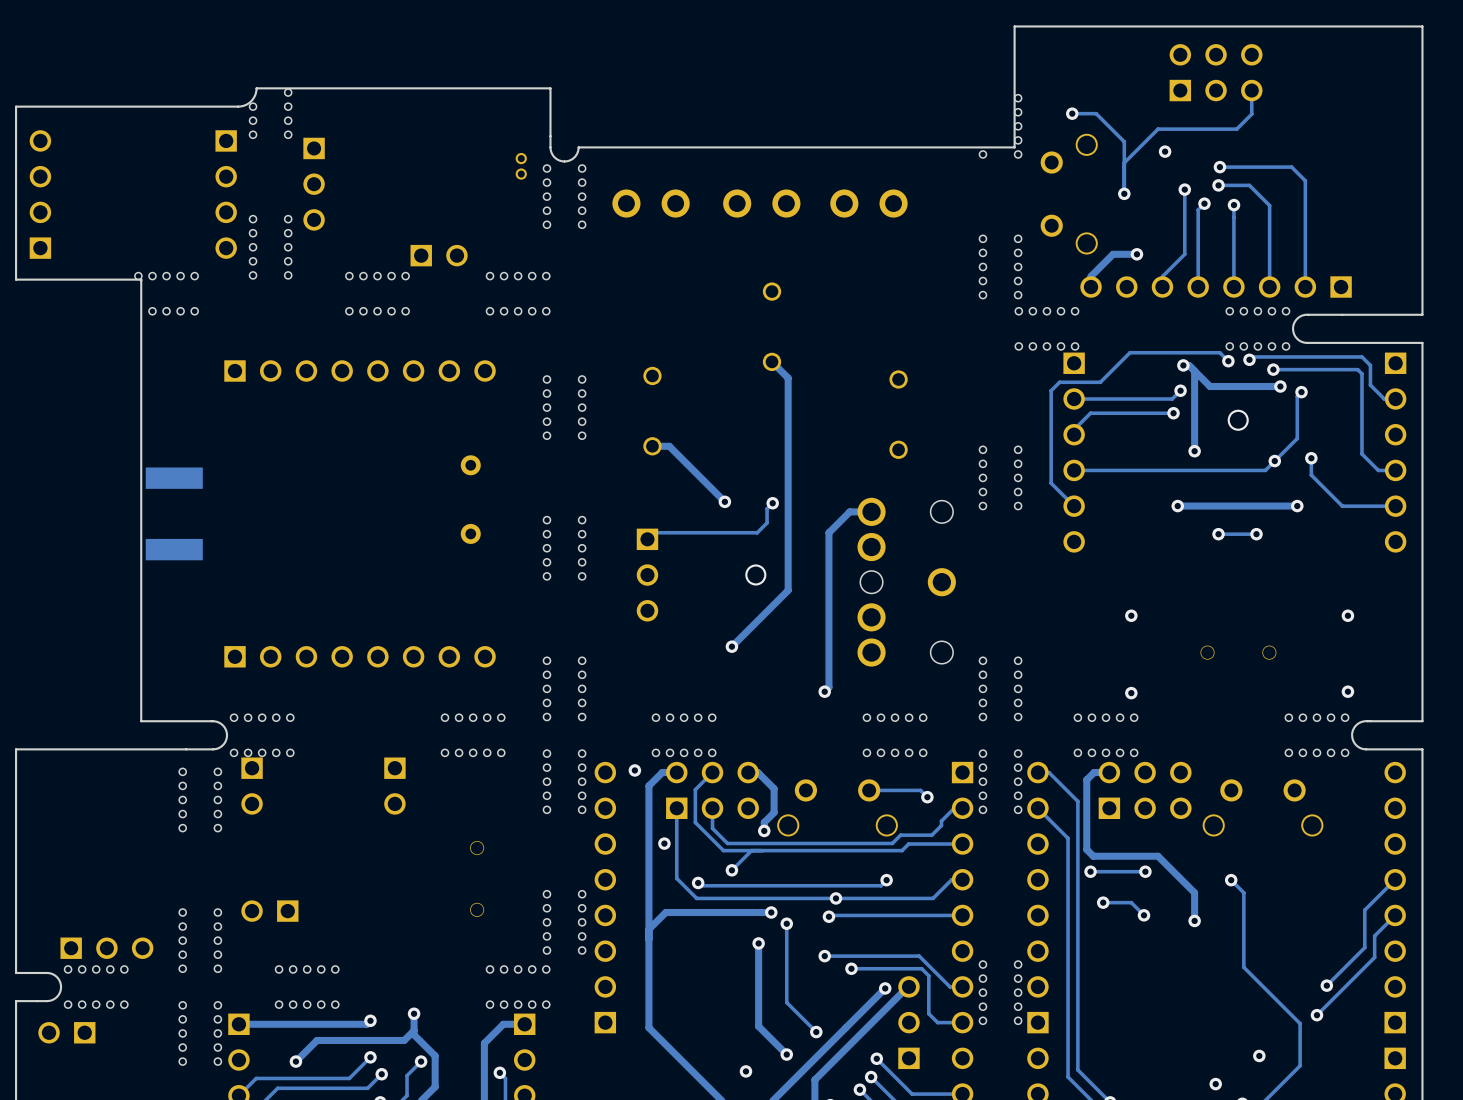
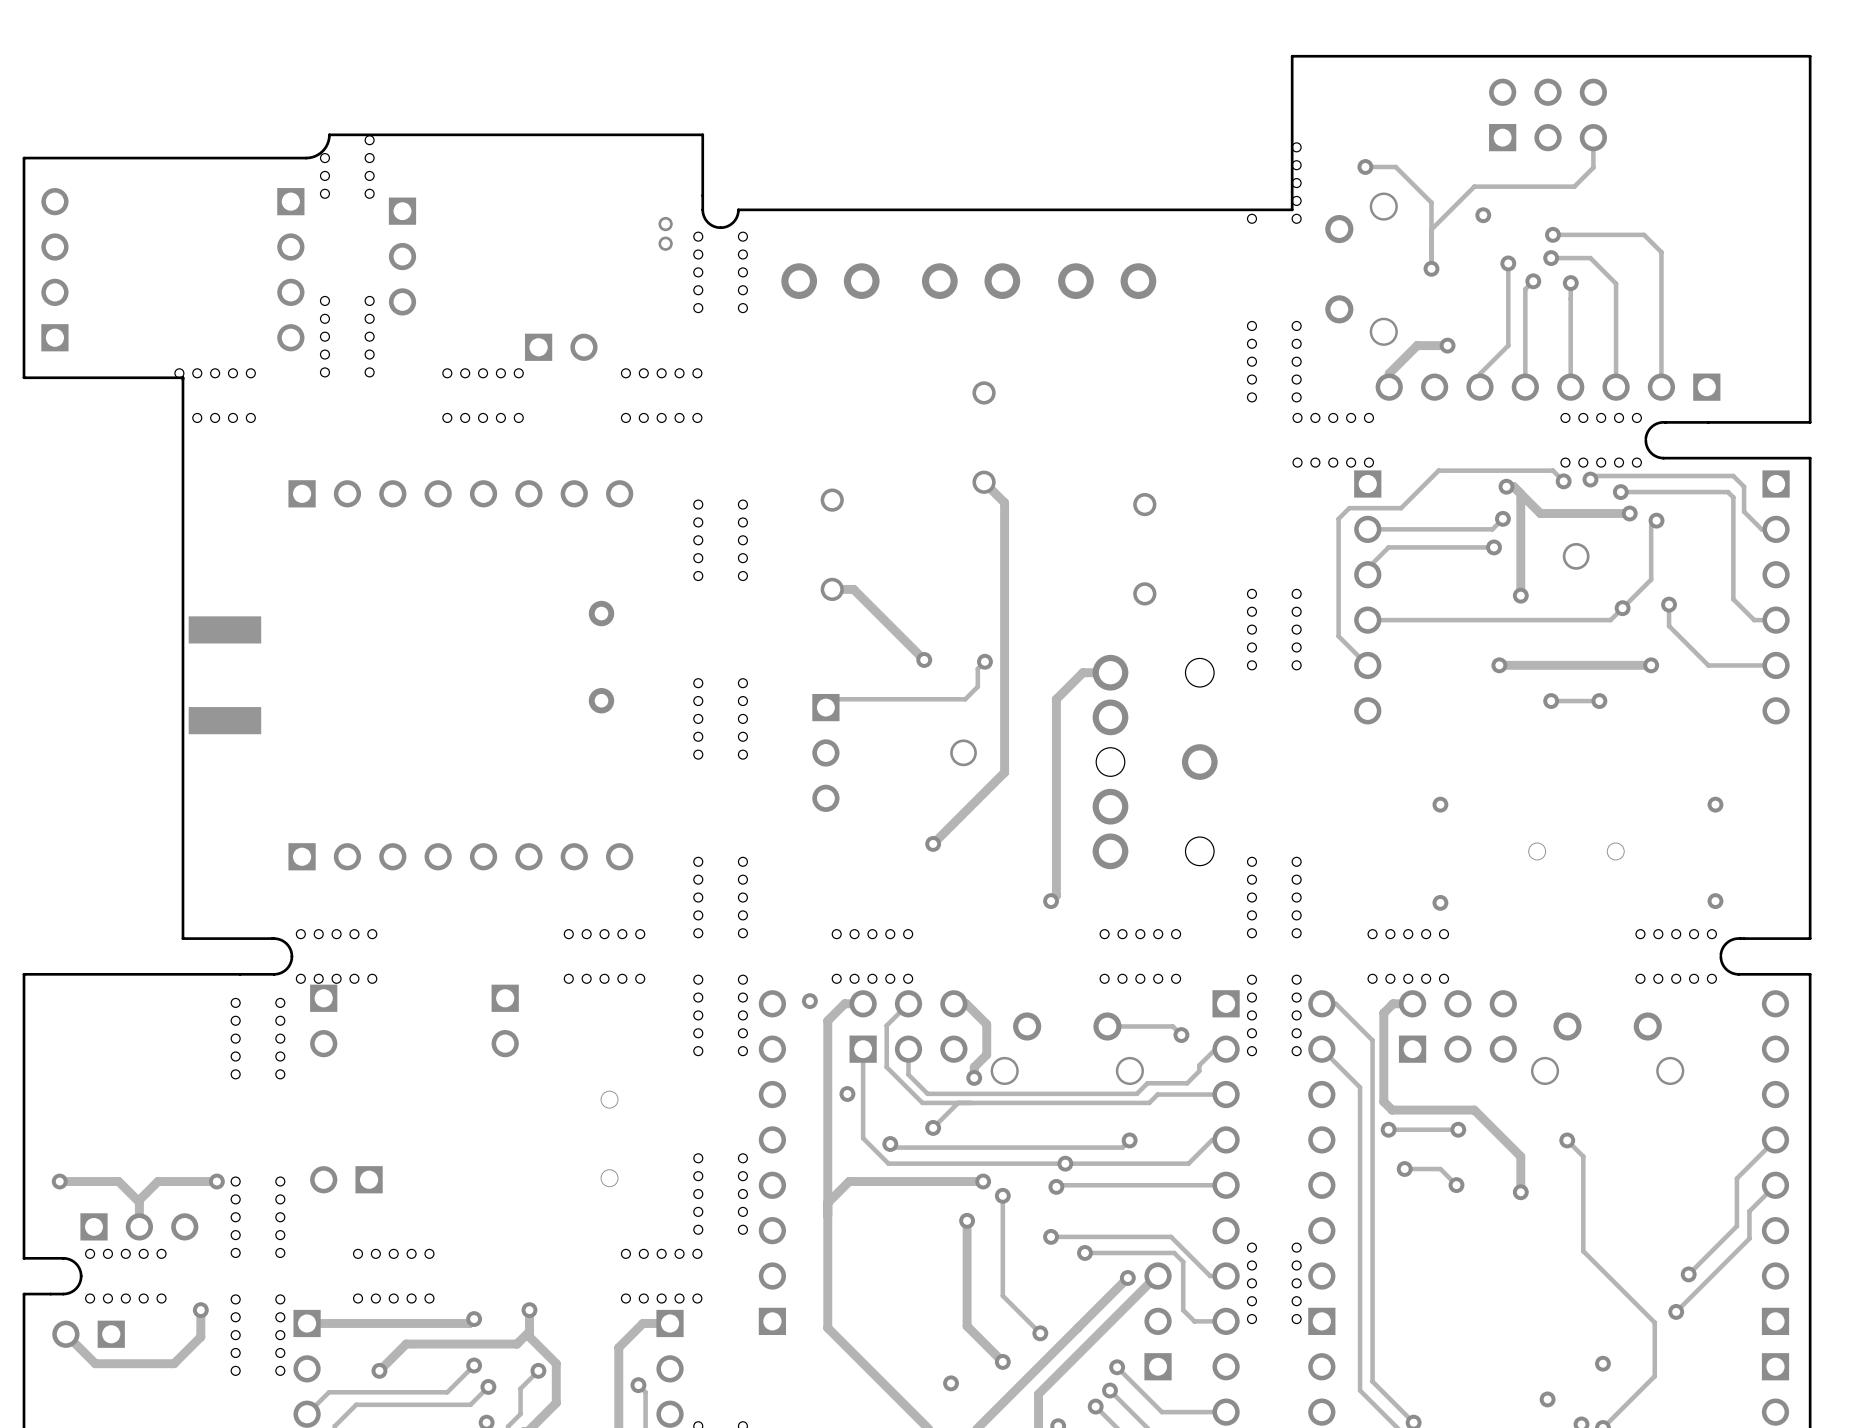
track: none -> (59, 1181) (118, 1181) (139, 1202)
via: none -> (59, 1181)
track: none -> (216, 1181) (157, 1181) (139, 1200) (139, 1226)
via: none -> (216, 1181)
track: none -> (200, 1310) (200, 1336) (174, 1363) (95, 1363) (65, 1334)
via: none -> (200, 1310)

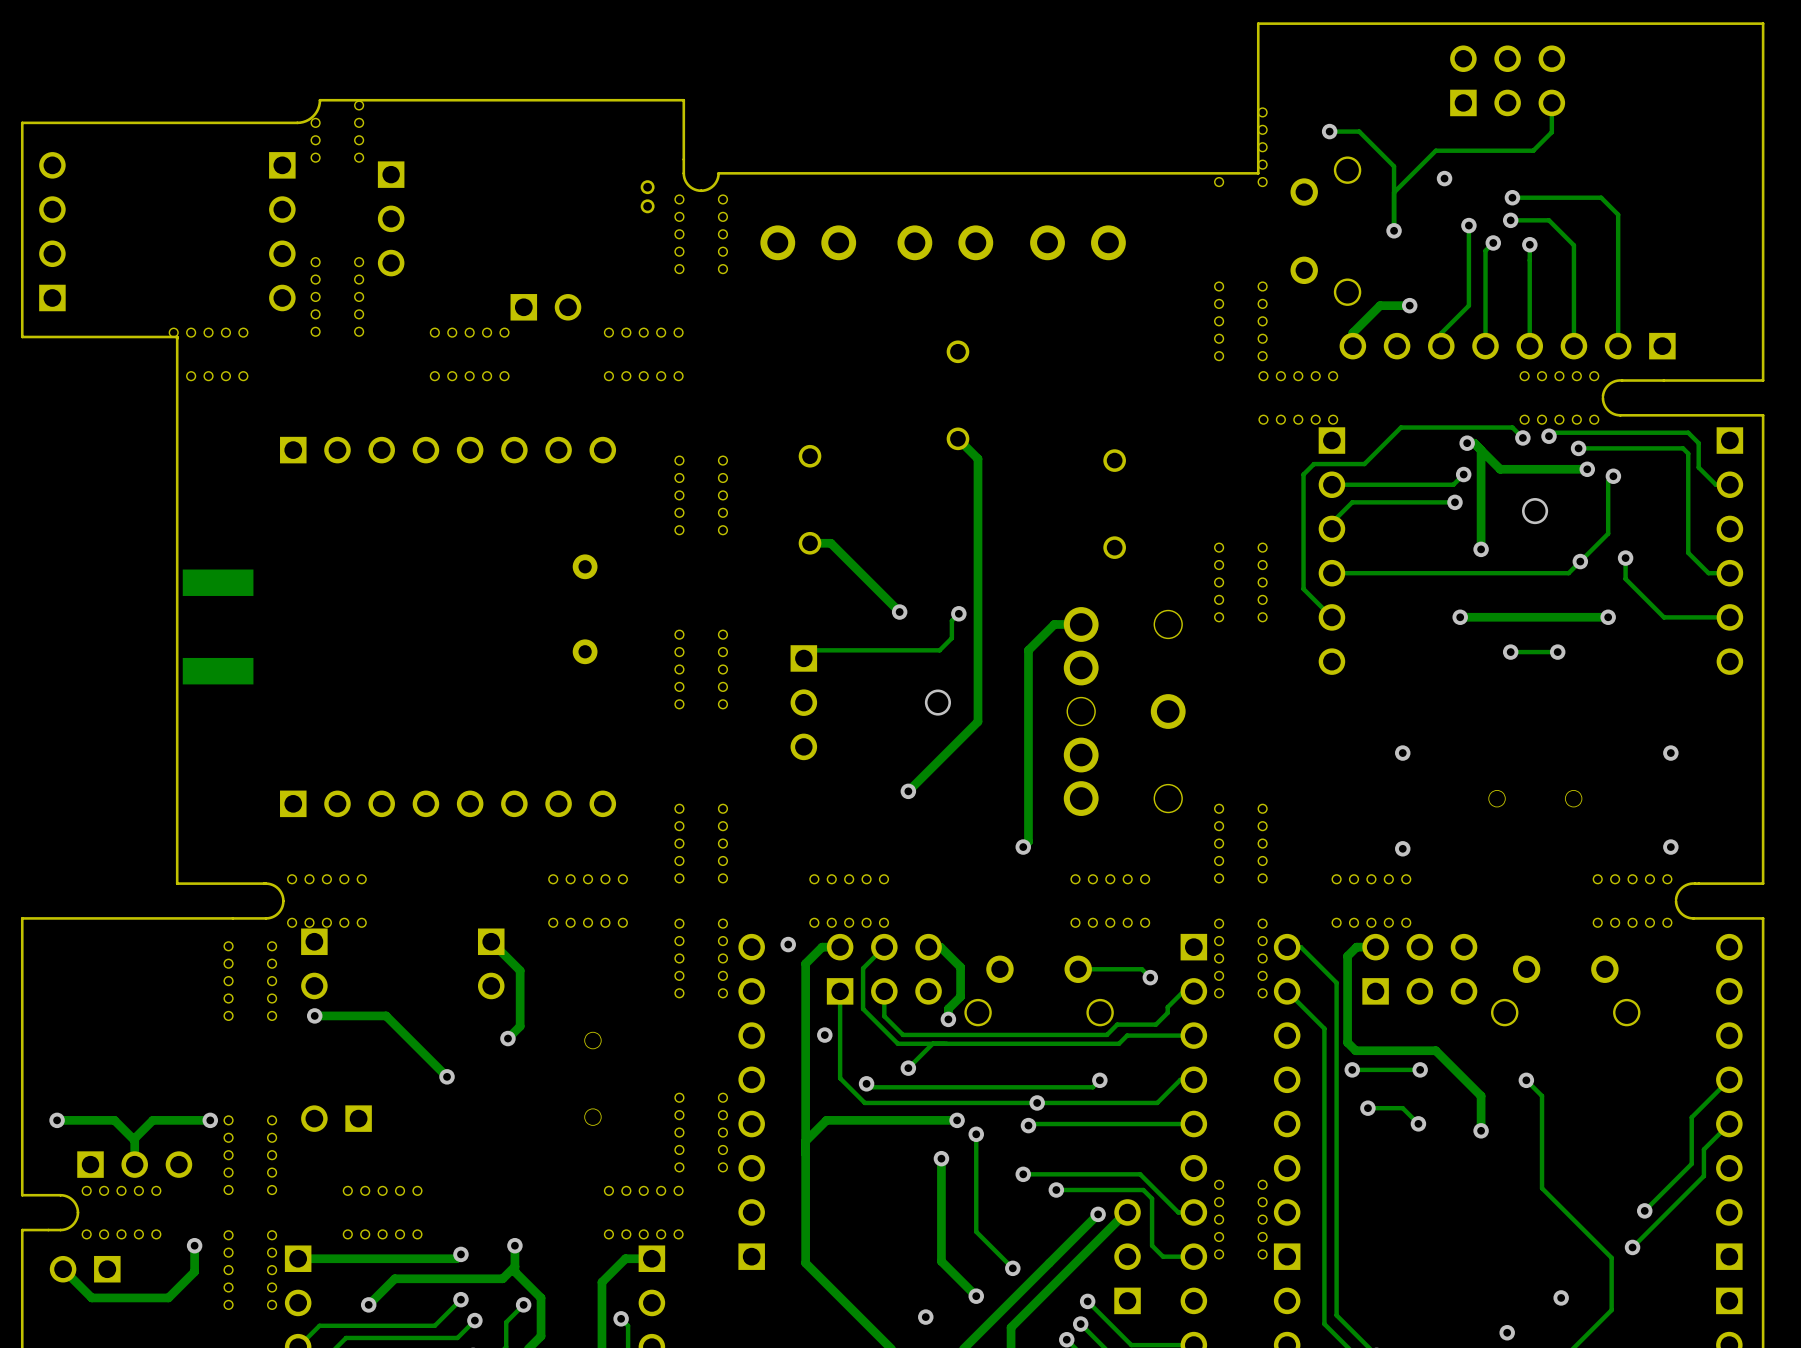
track: none -> (491, 941) (520, 970) (520, 1026) (507, 1038)
track: none -> (314, 1015) (386, 1015) (447, 1076)
via: none -> (314, 1015)
via: none -> (507, 1038)
via: none -> (447, 1076)

